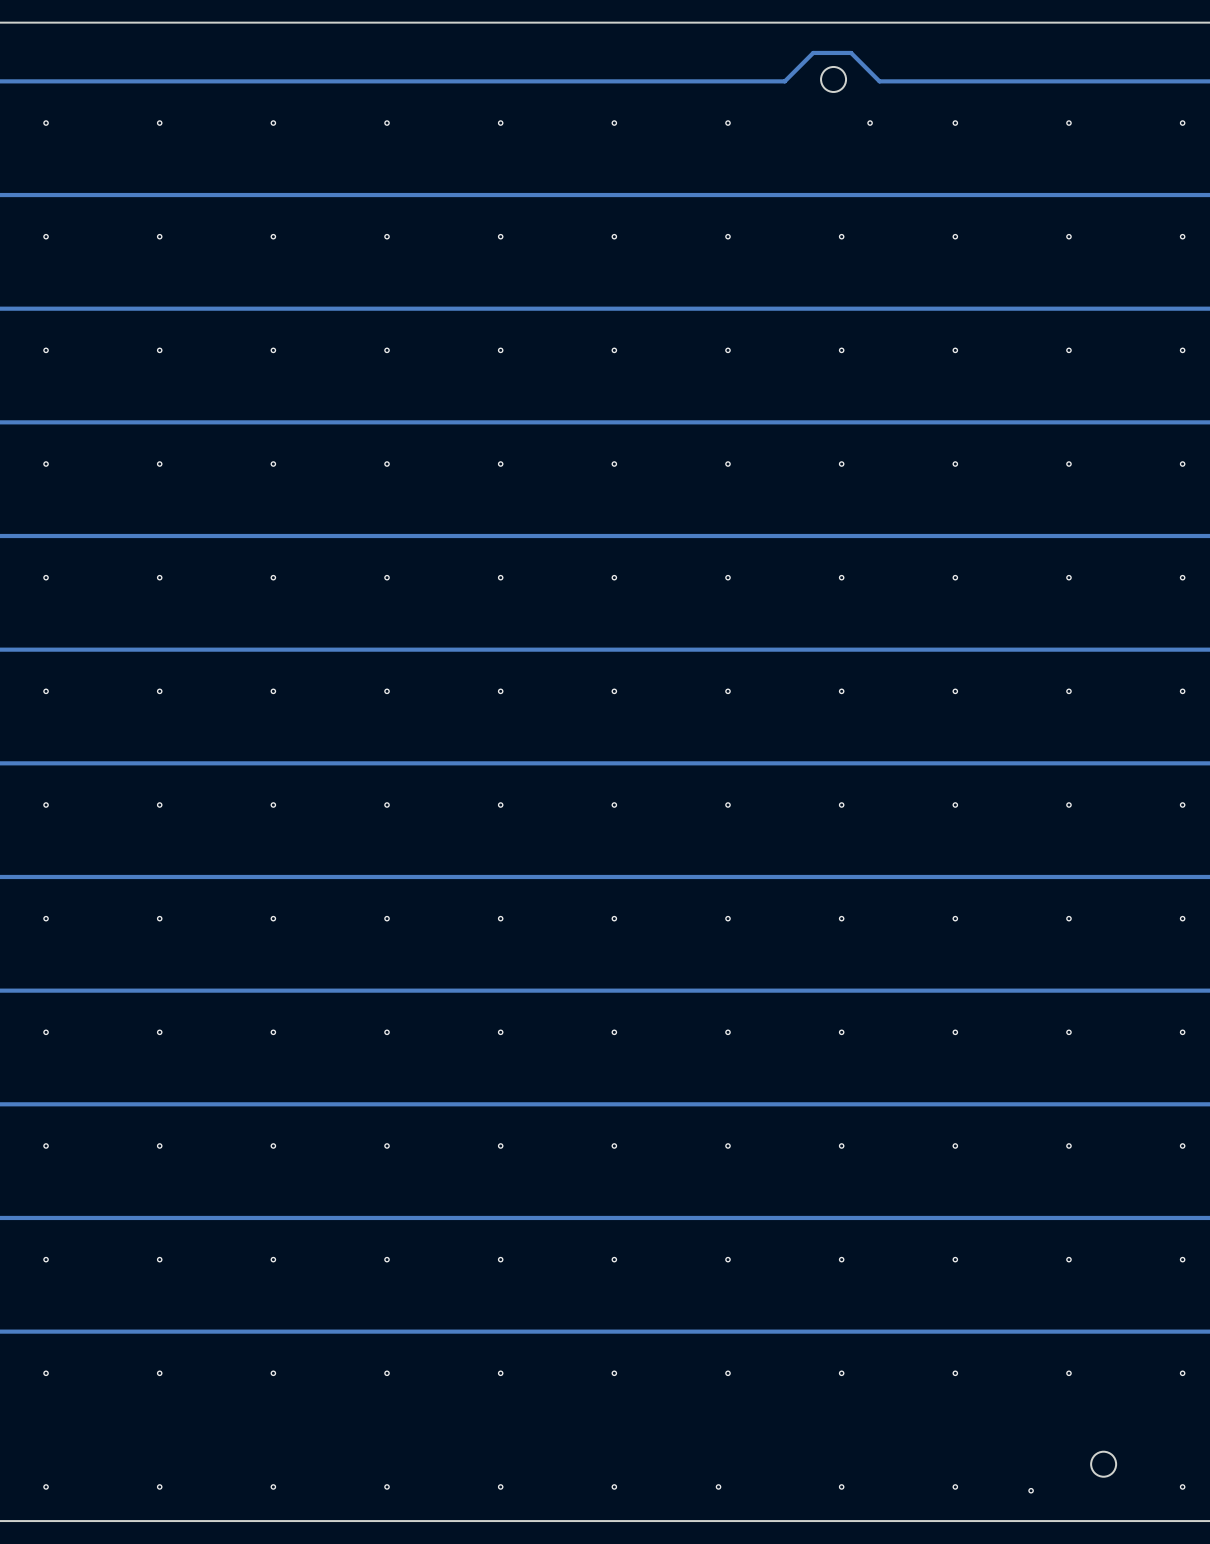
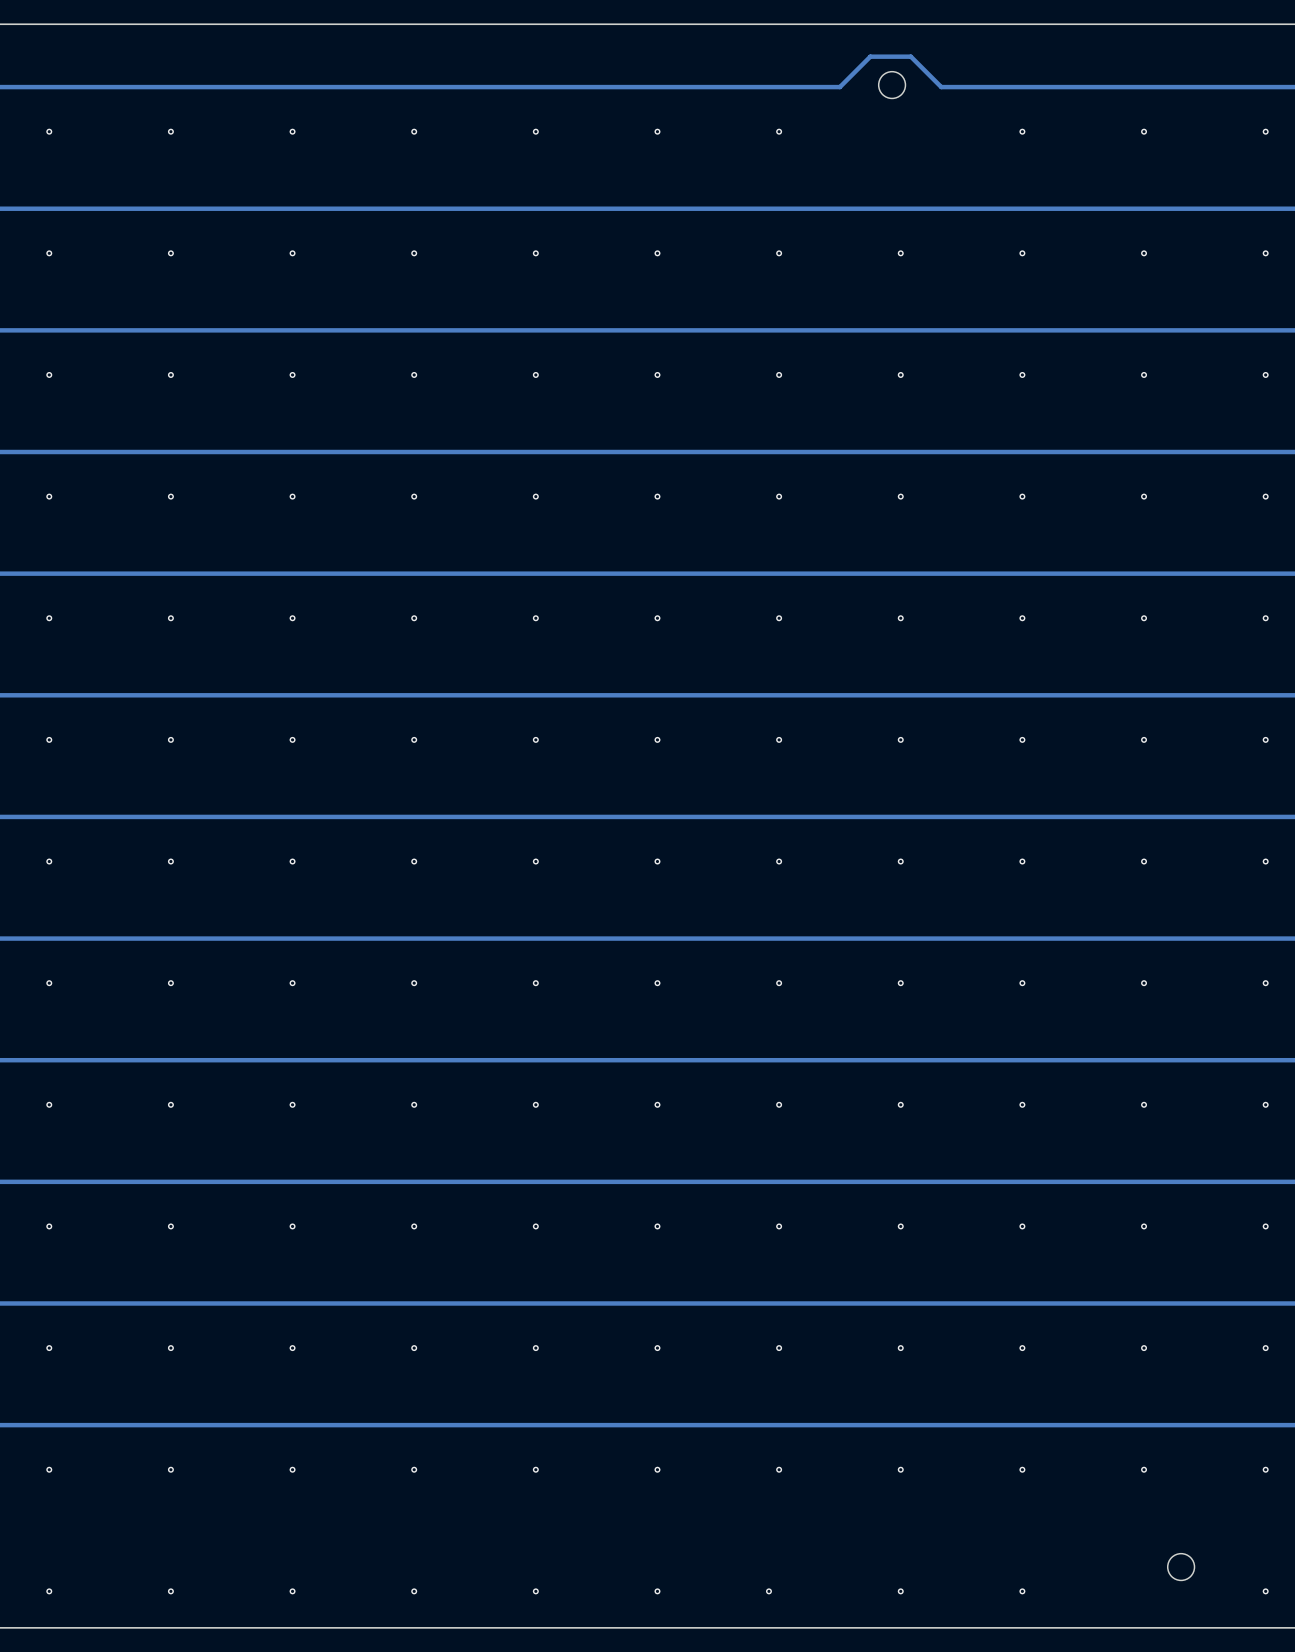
via: (870, 123) -> none
via: (1031, 1490) -> none

